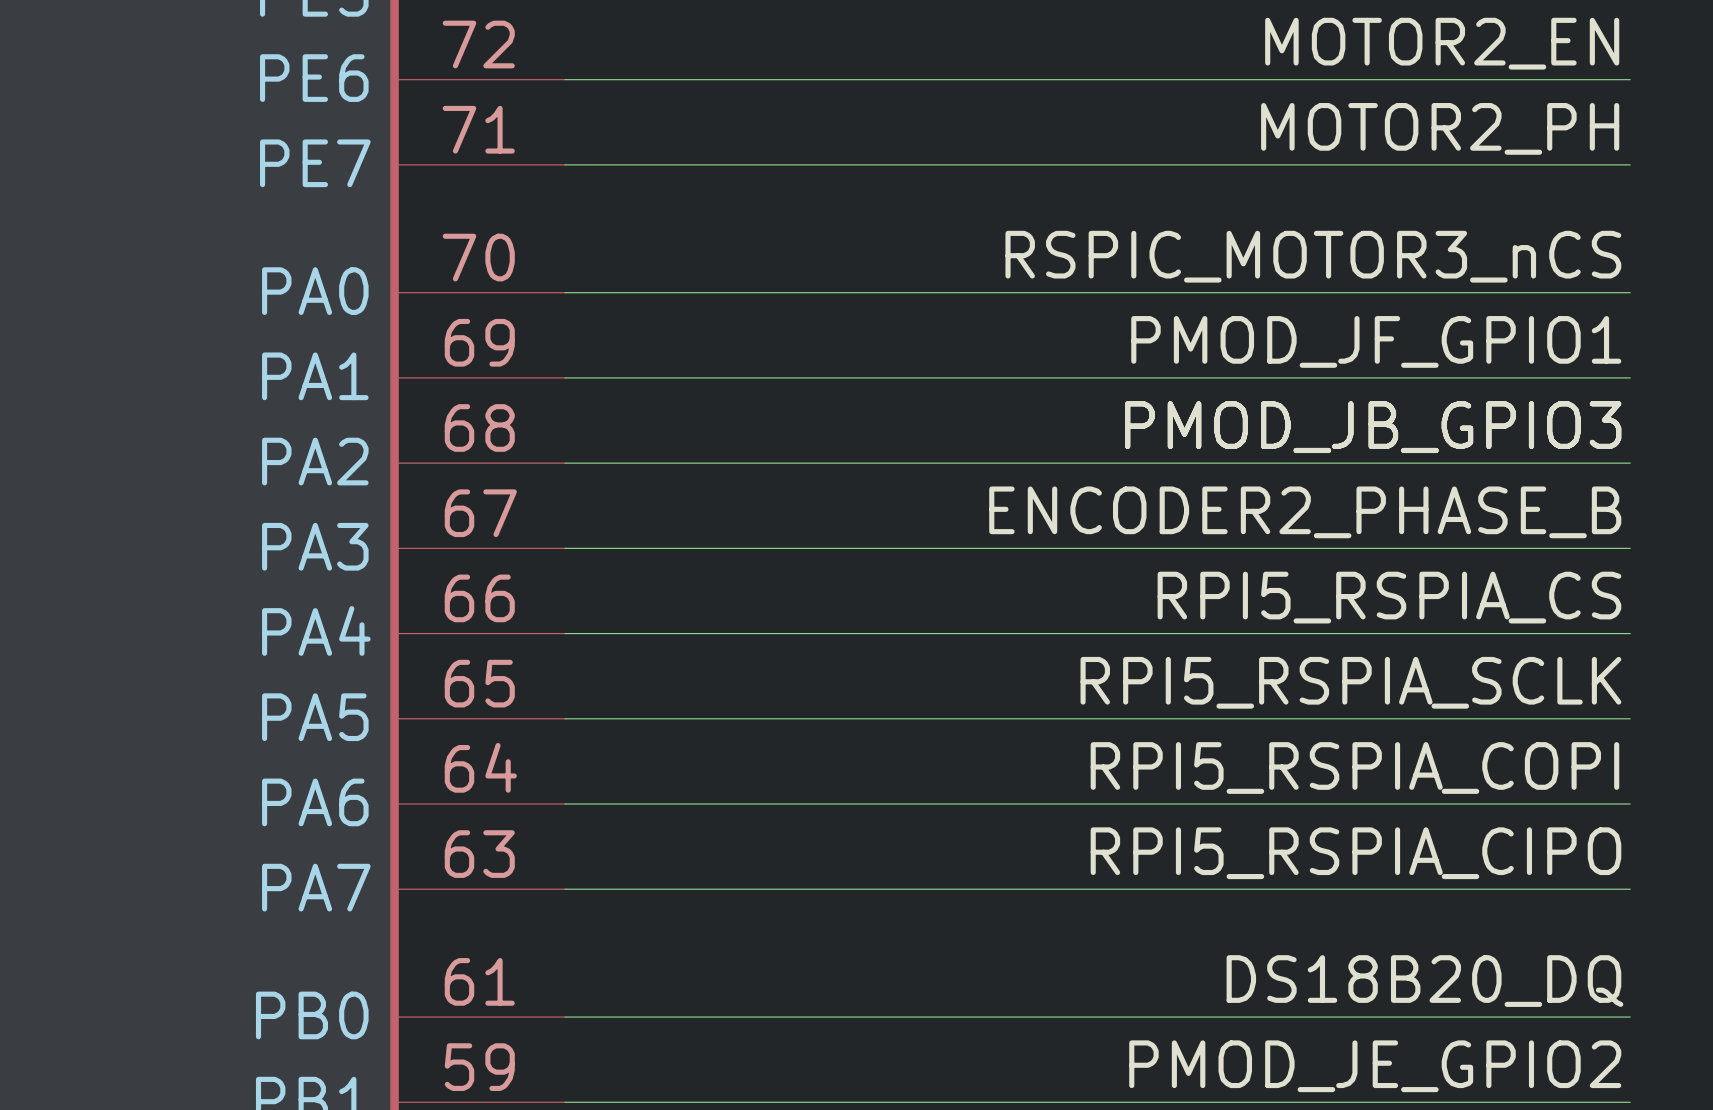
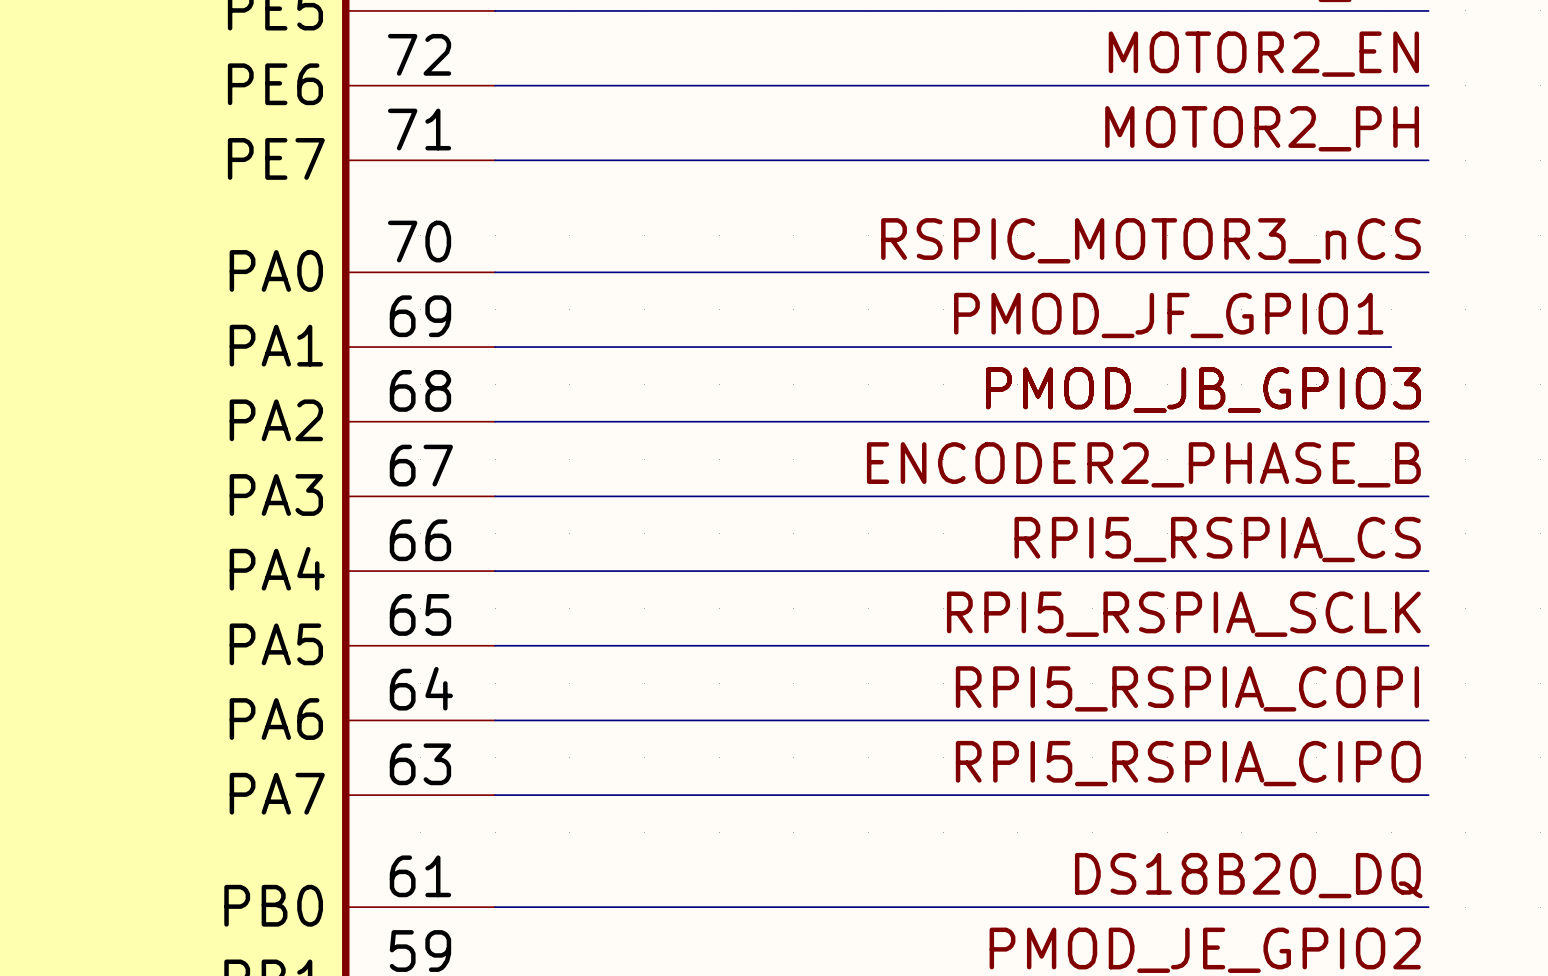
label position: PMOD_JF_GPIO1 (1376, 341) -> PMOD_JF_GPIO1 (1168, 315)
wire: (1587, 377) (1630, 377) -> none

